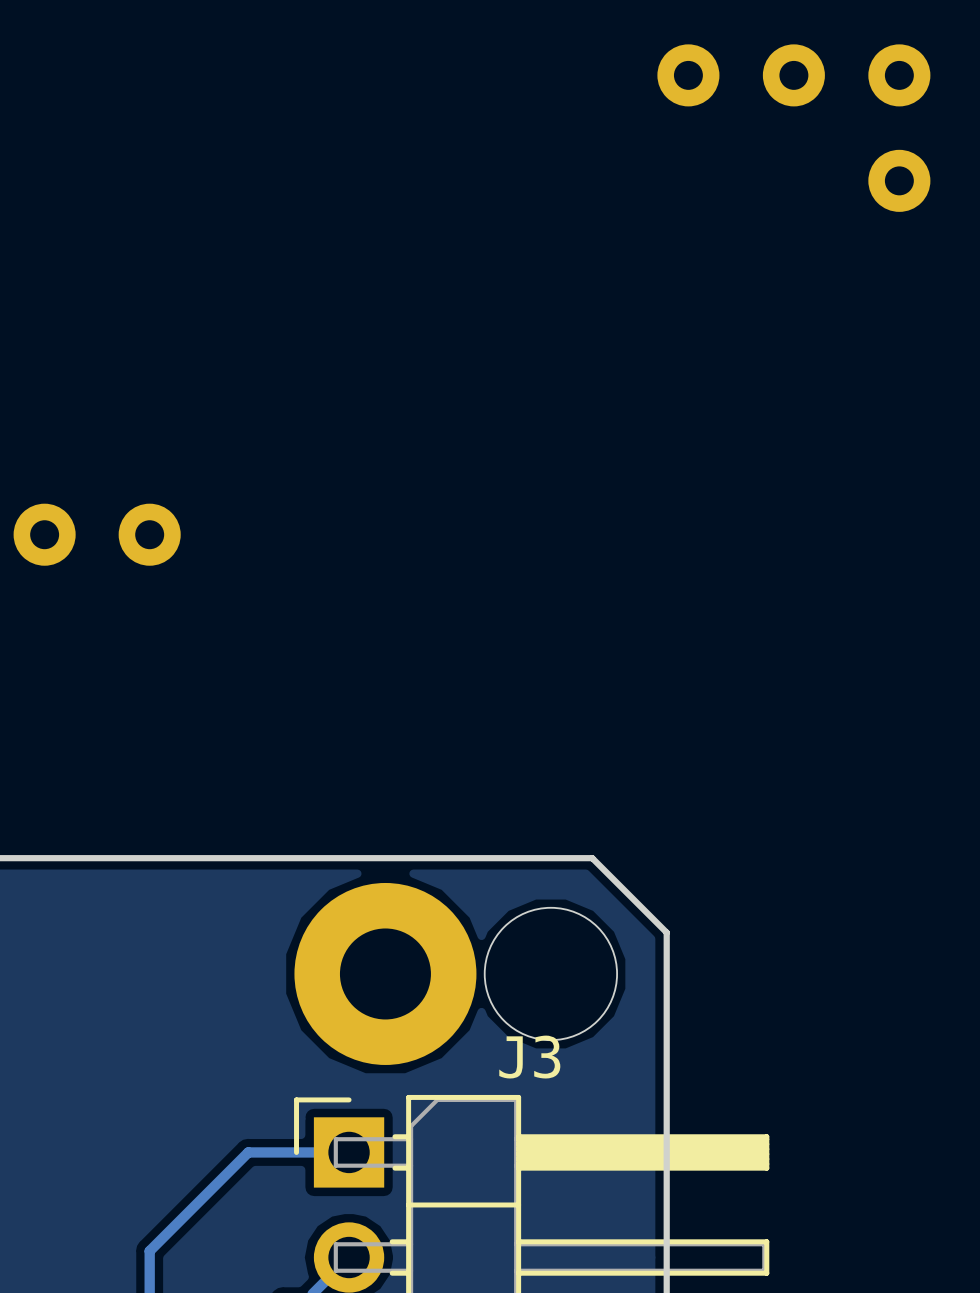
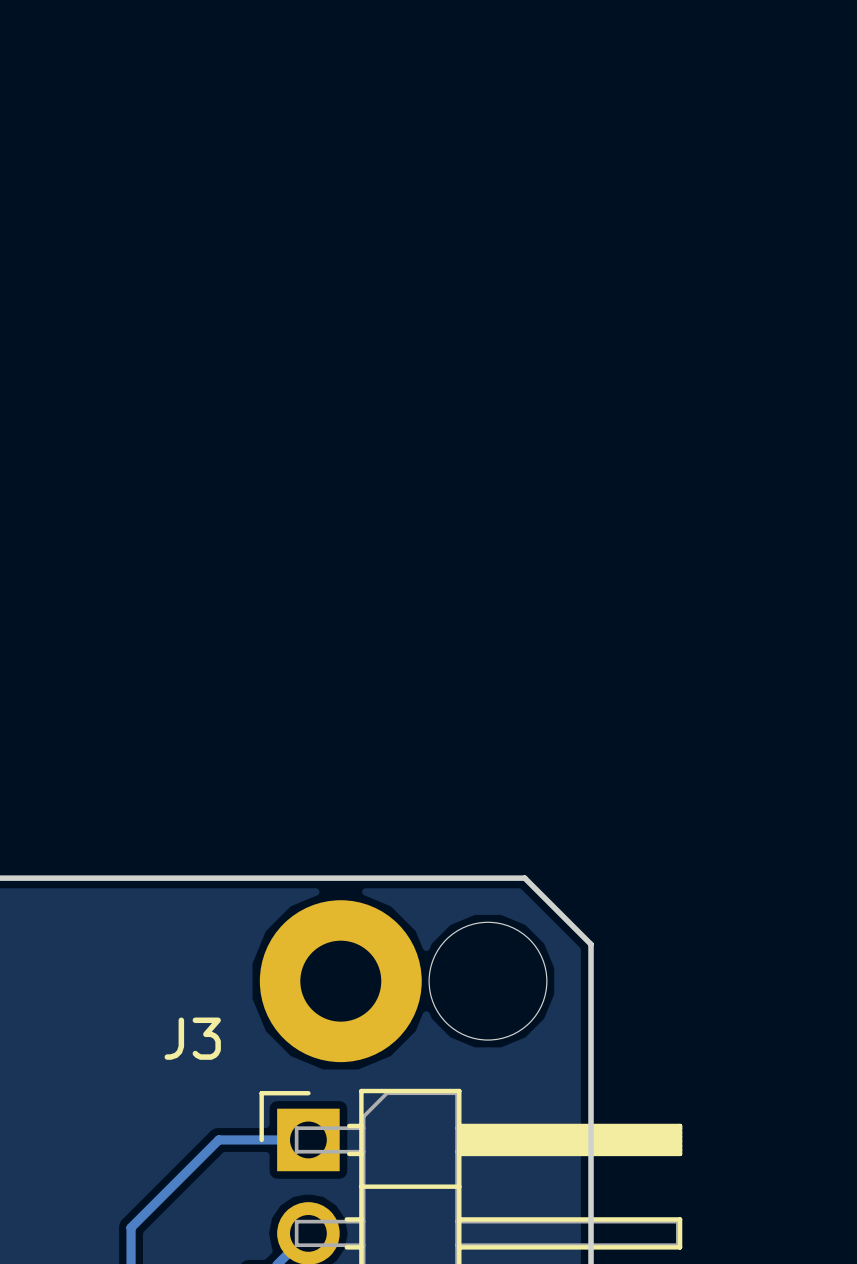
part: (688, 75) -> none
part: (793, 75) -> none
part: (899, 75) -> none
part: (899, 180) -> none
part: (44, 534) -> none
part: (149, 534) -> none
J3 name position: J3 (529, 1057) -> J3 (192, 1038)

